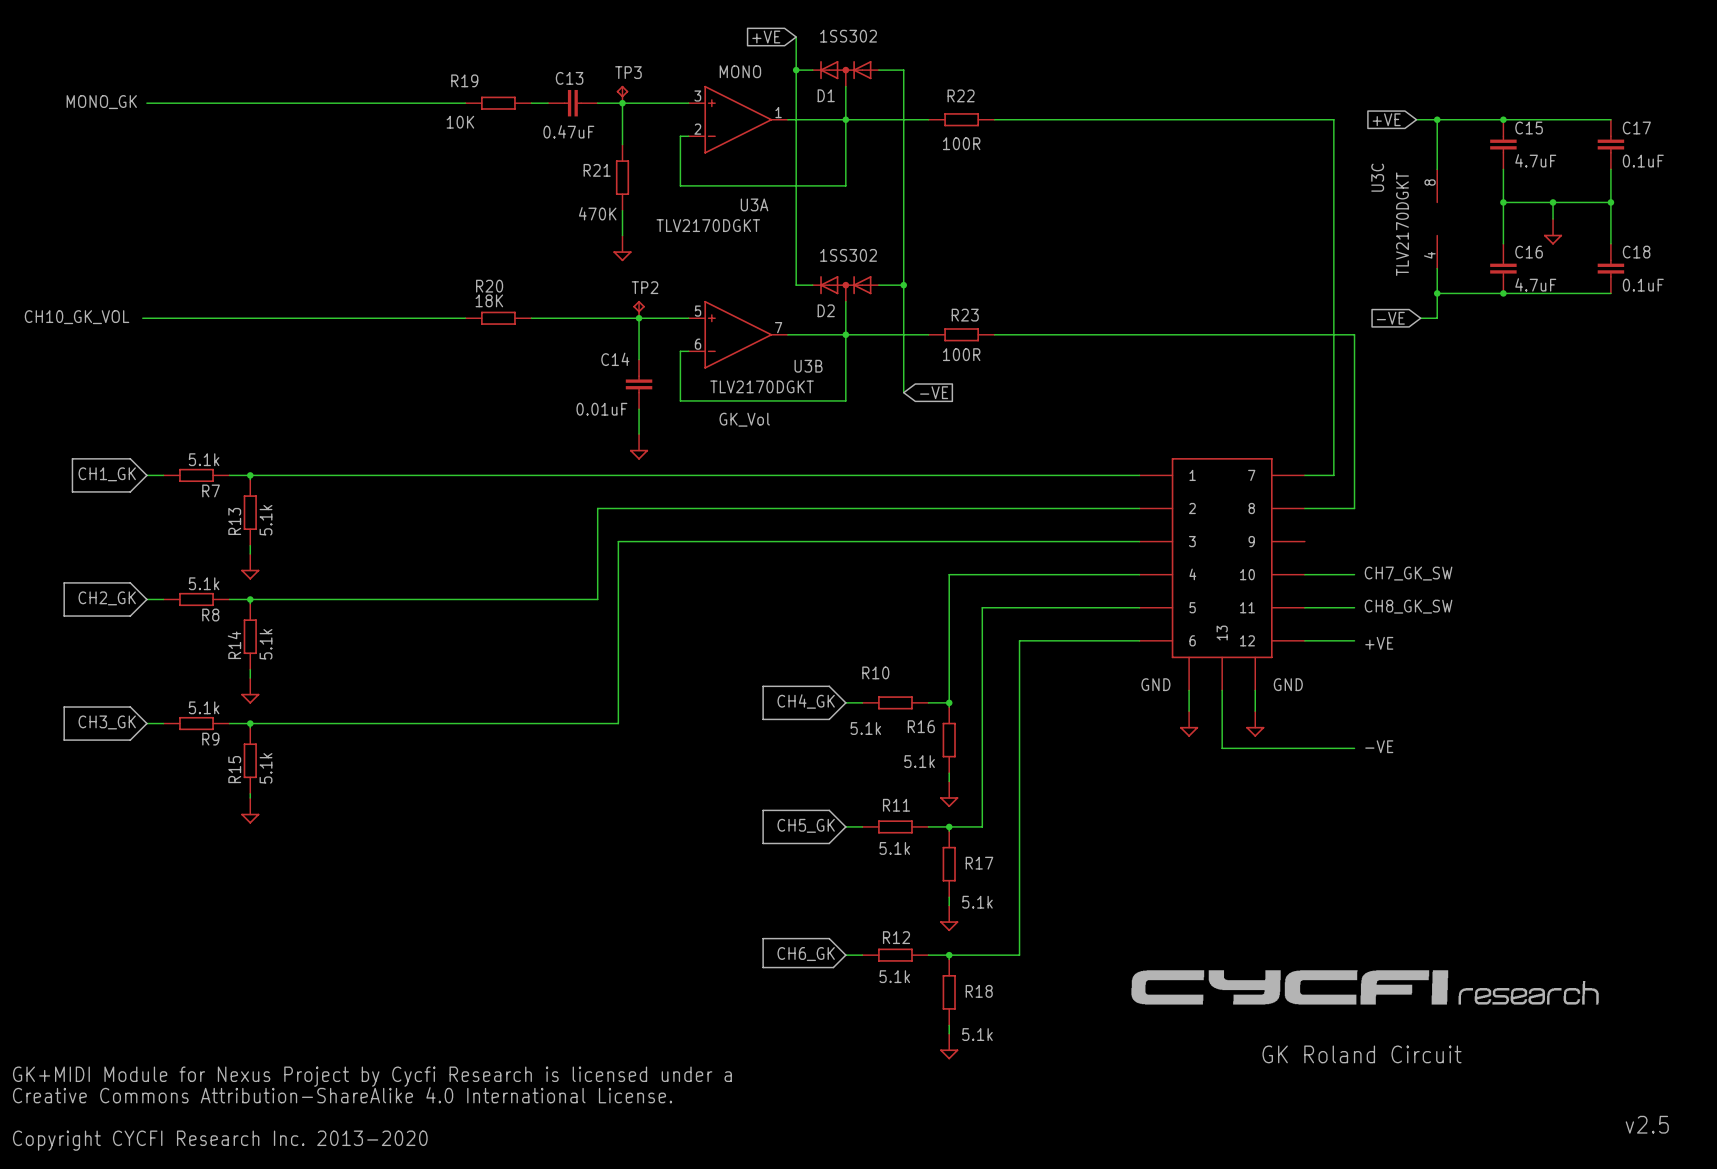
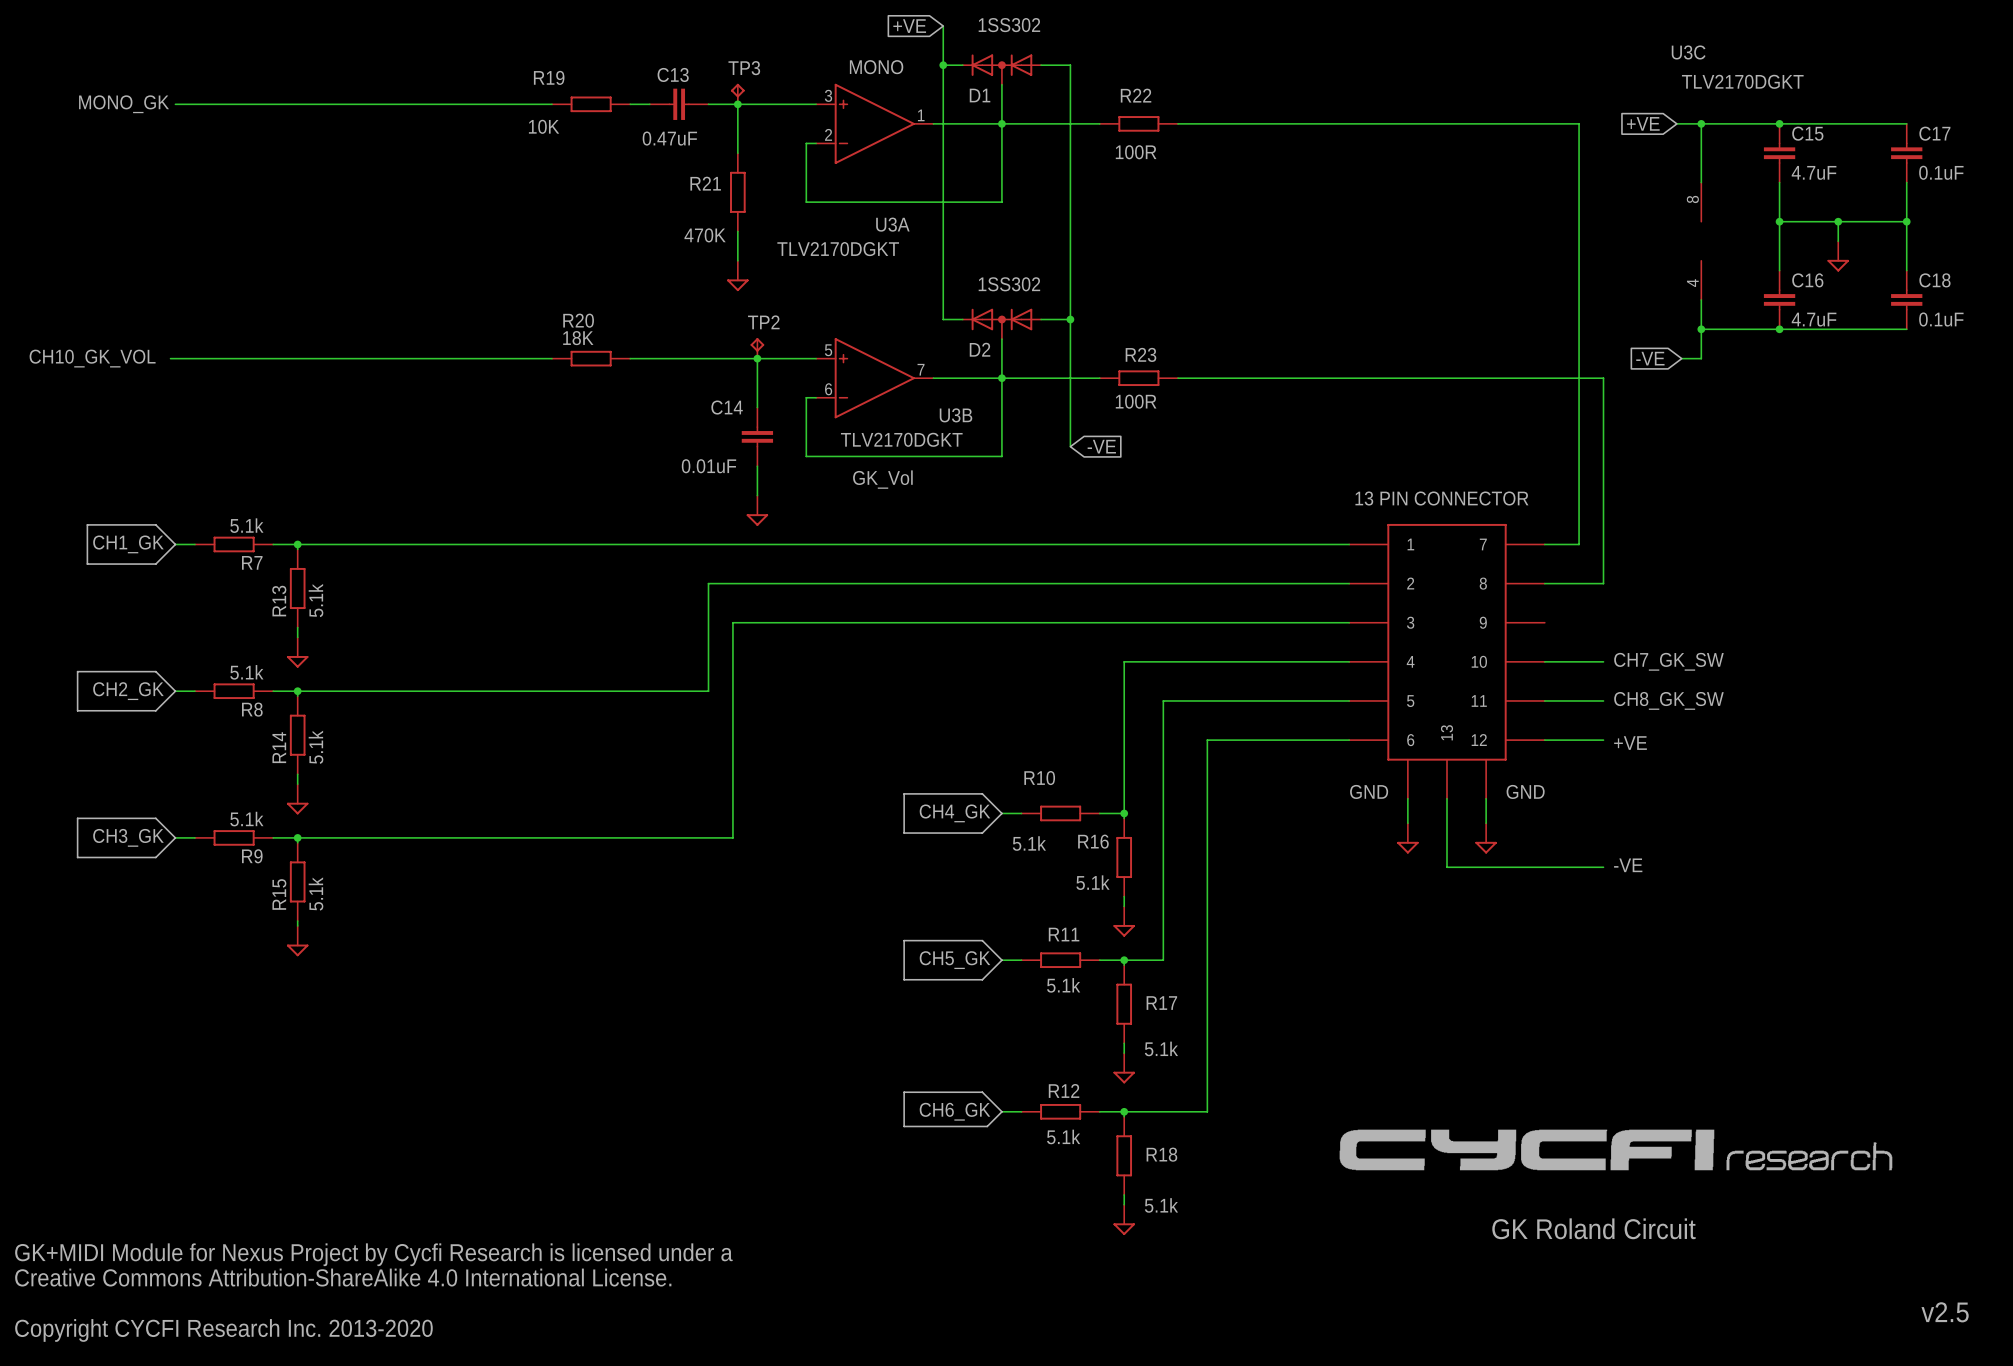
text rotation: 0° (1377, 177) -> 90° clockwise (1688, 52)
text position: U3C (1377, 177) -> U3C (1688, 52)
part value rotation: 0° (1402, 224) -> 90° clockwise (1742, 81)
part value position: TLV2170DGKT (1402, 224) -> TLV2170DGKT (1742, 81)
text: none -> 13 PIN CONNECTOR (1441, 498)

